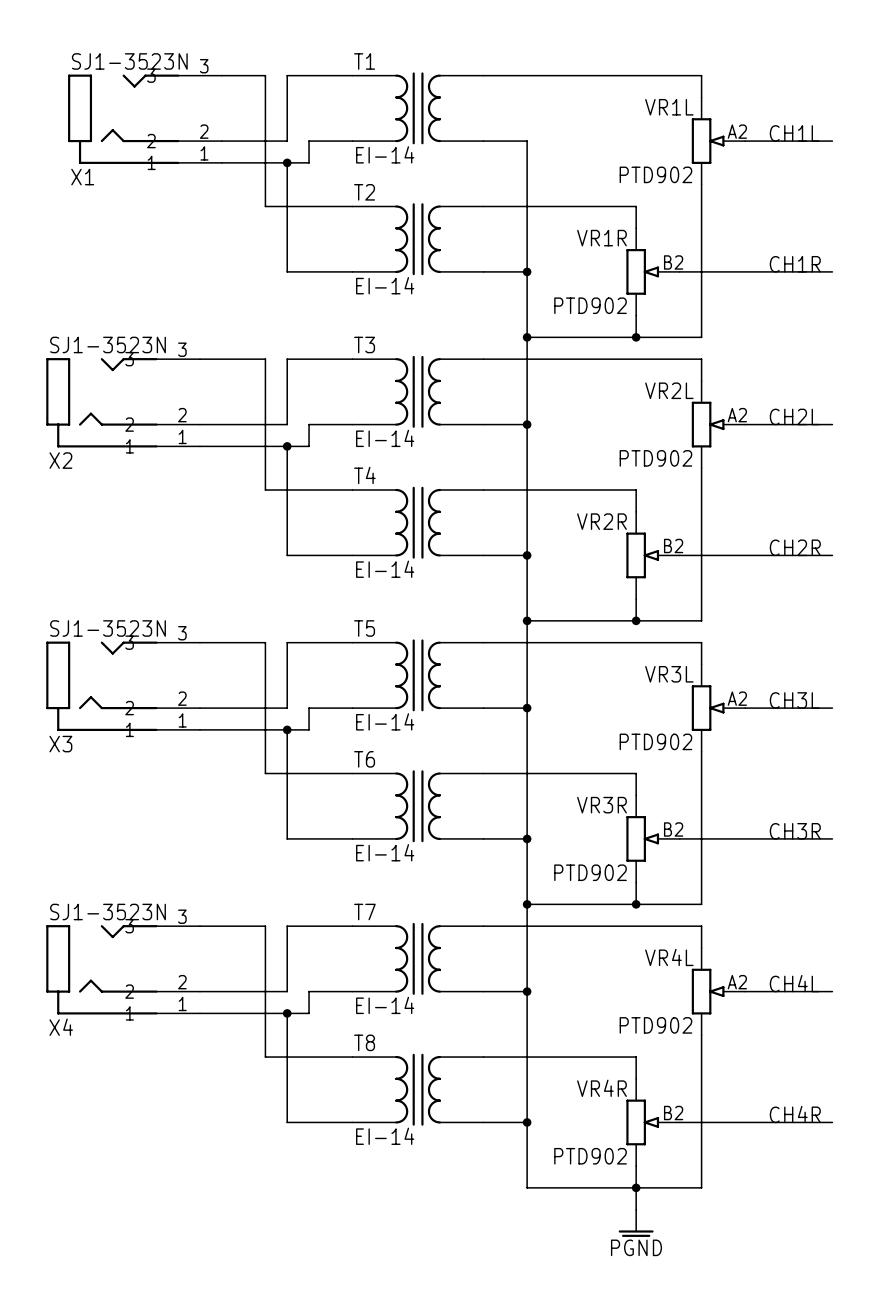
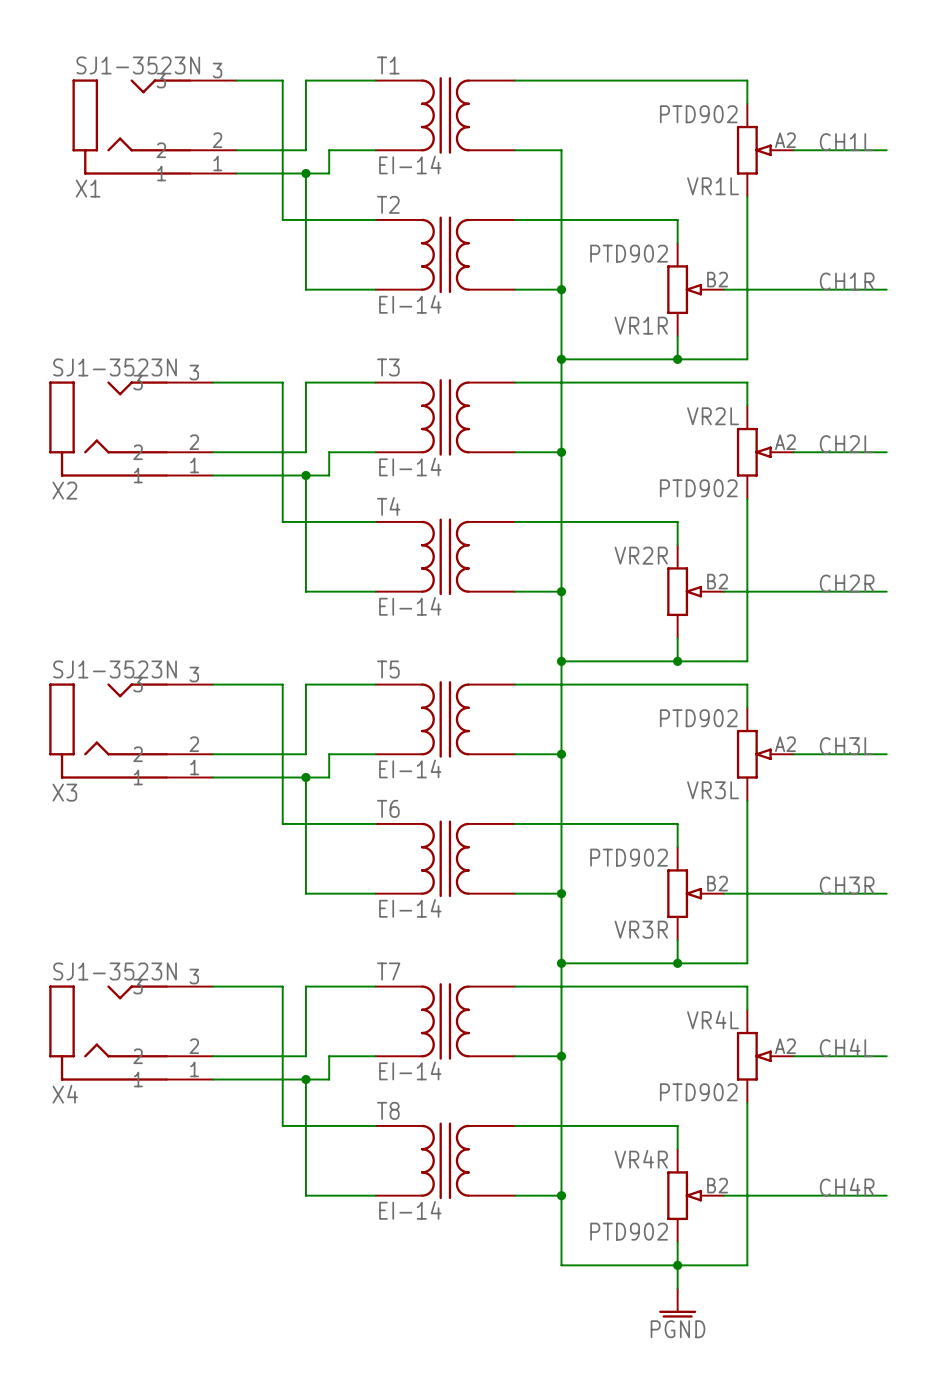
VR1L name position: VR1L (669, 107) -> VR1L (713, 186)
VR1L value position: PTD902 (655, 174) -> PTD902 (698, 114)
VR1R name position: VR1R (601, 238) -> VR1R (641, 325)
VR1R value position: PTD902 (590, 305) -> PTD902 (629, 253)
VR3L name position: VR3L (669, 674) -> VR3L (713, 790)
VR3L value position: PTD902 (655, 741) -> PTD902 (698, 718)
VR3R name position: VR3R (601, 805) -> VR3R (641, 929)
VR3R value position: PTD902 (590, 872) -> PTD902 (629, 857)

